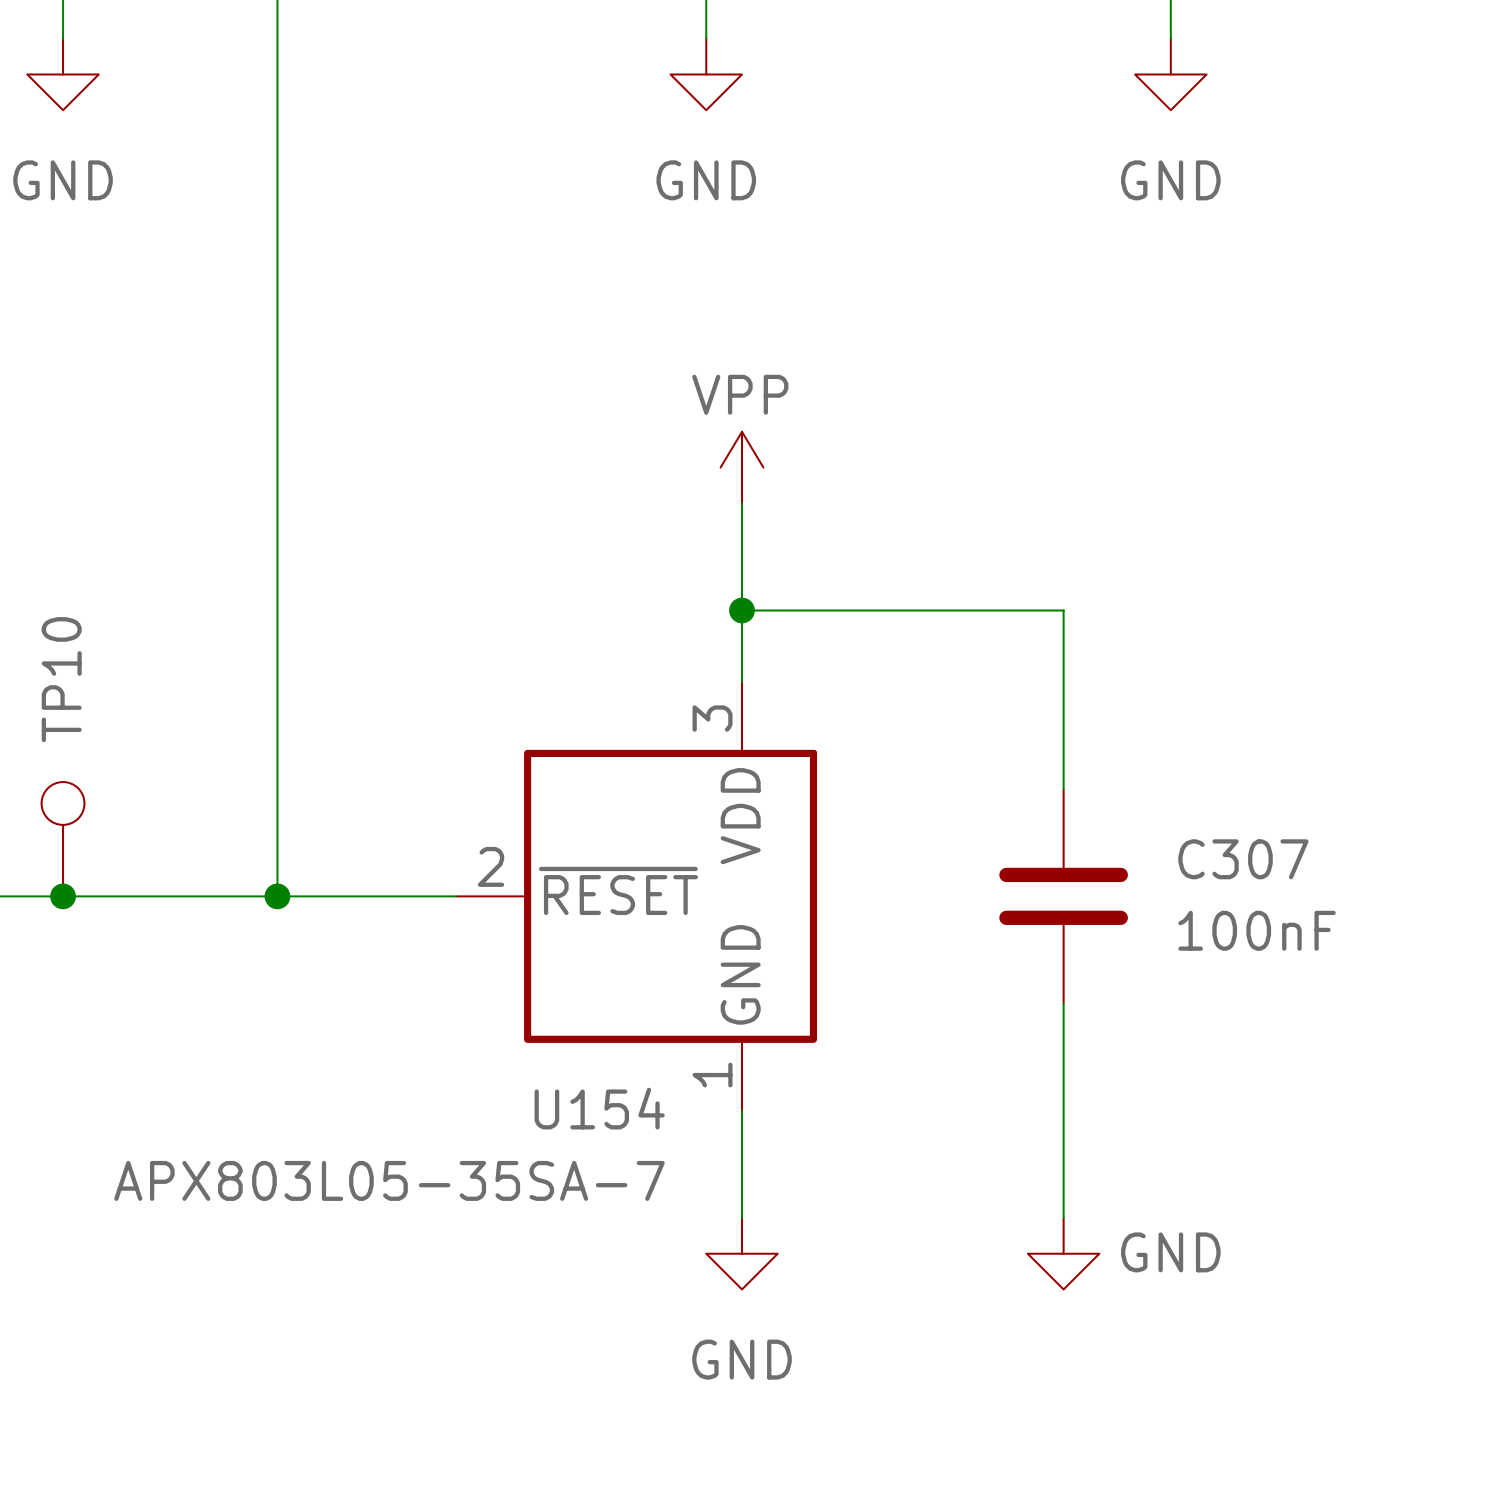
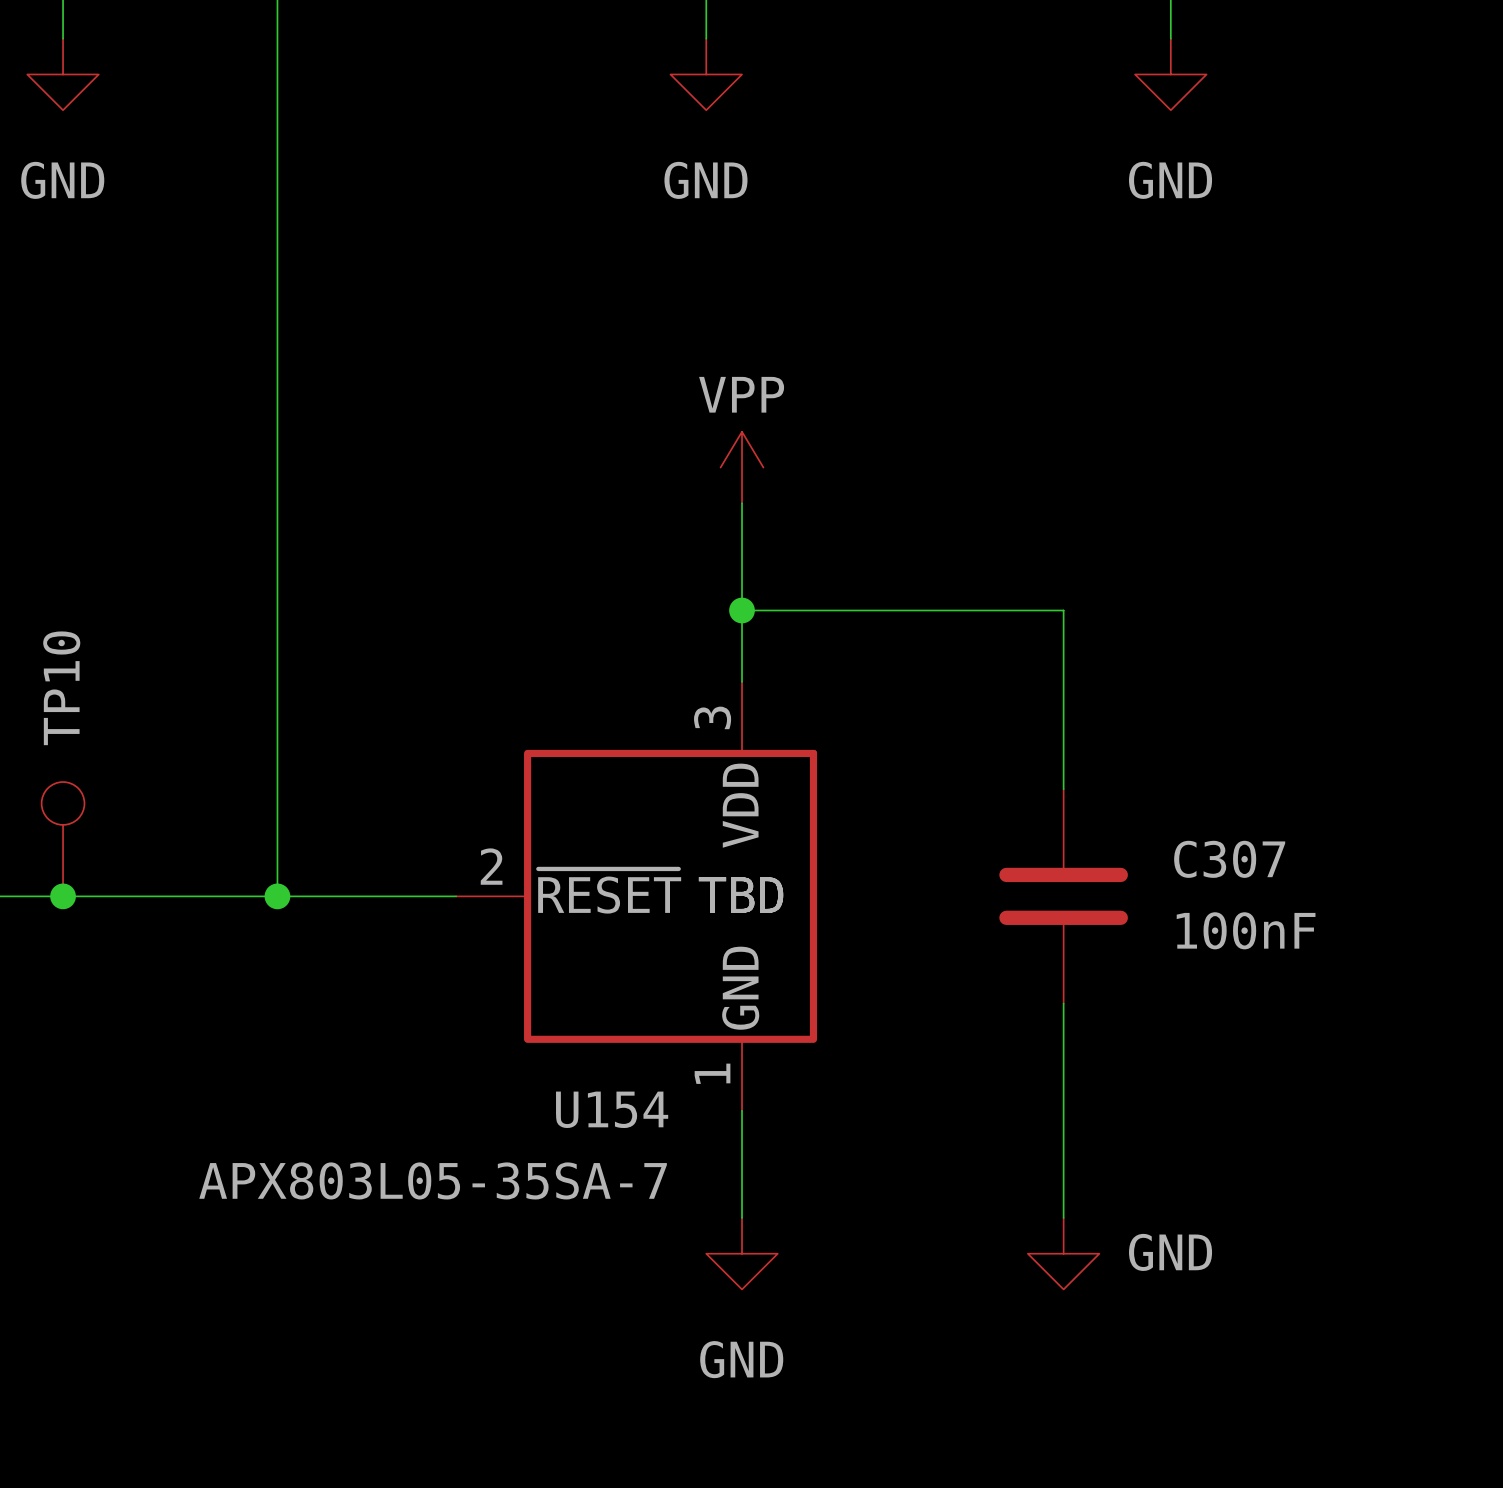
U154 text: none -> TBD (741, 895)
U154 text: none -> TBD (741, 895)

